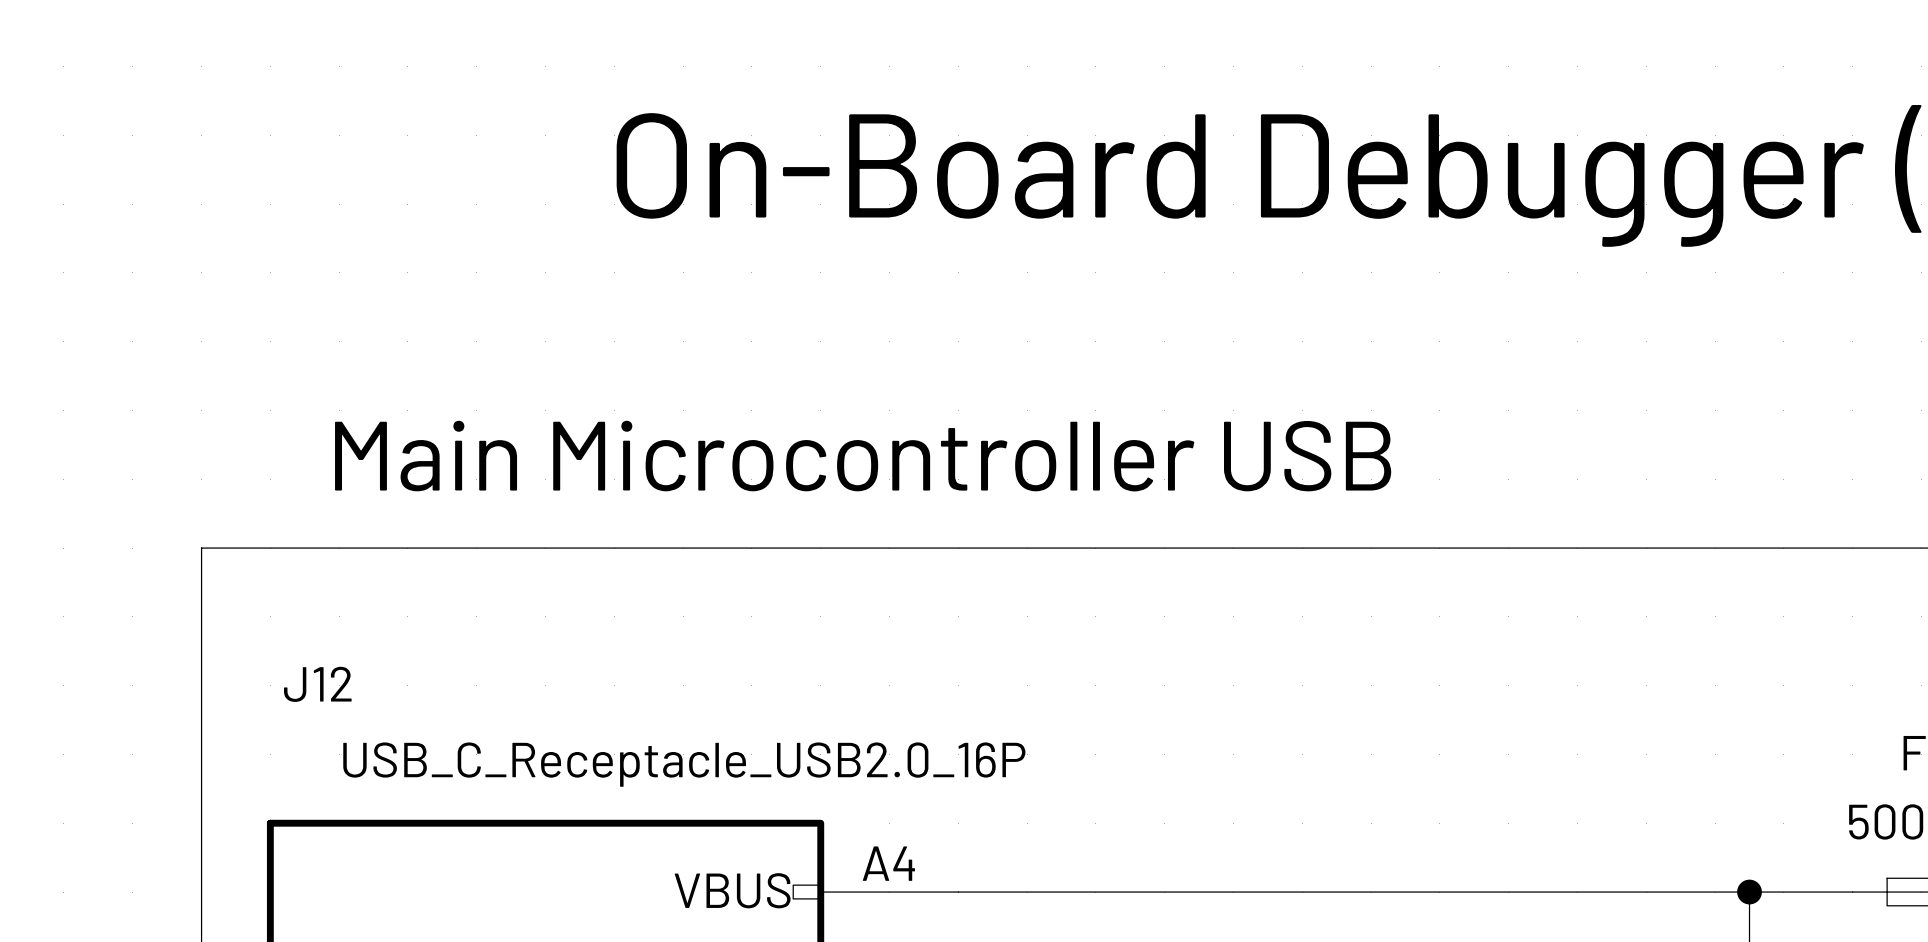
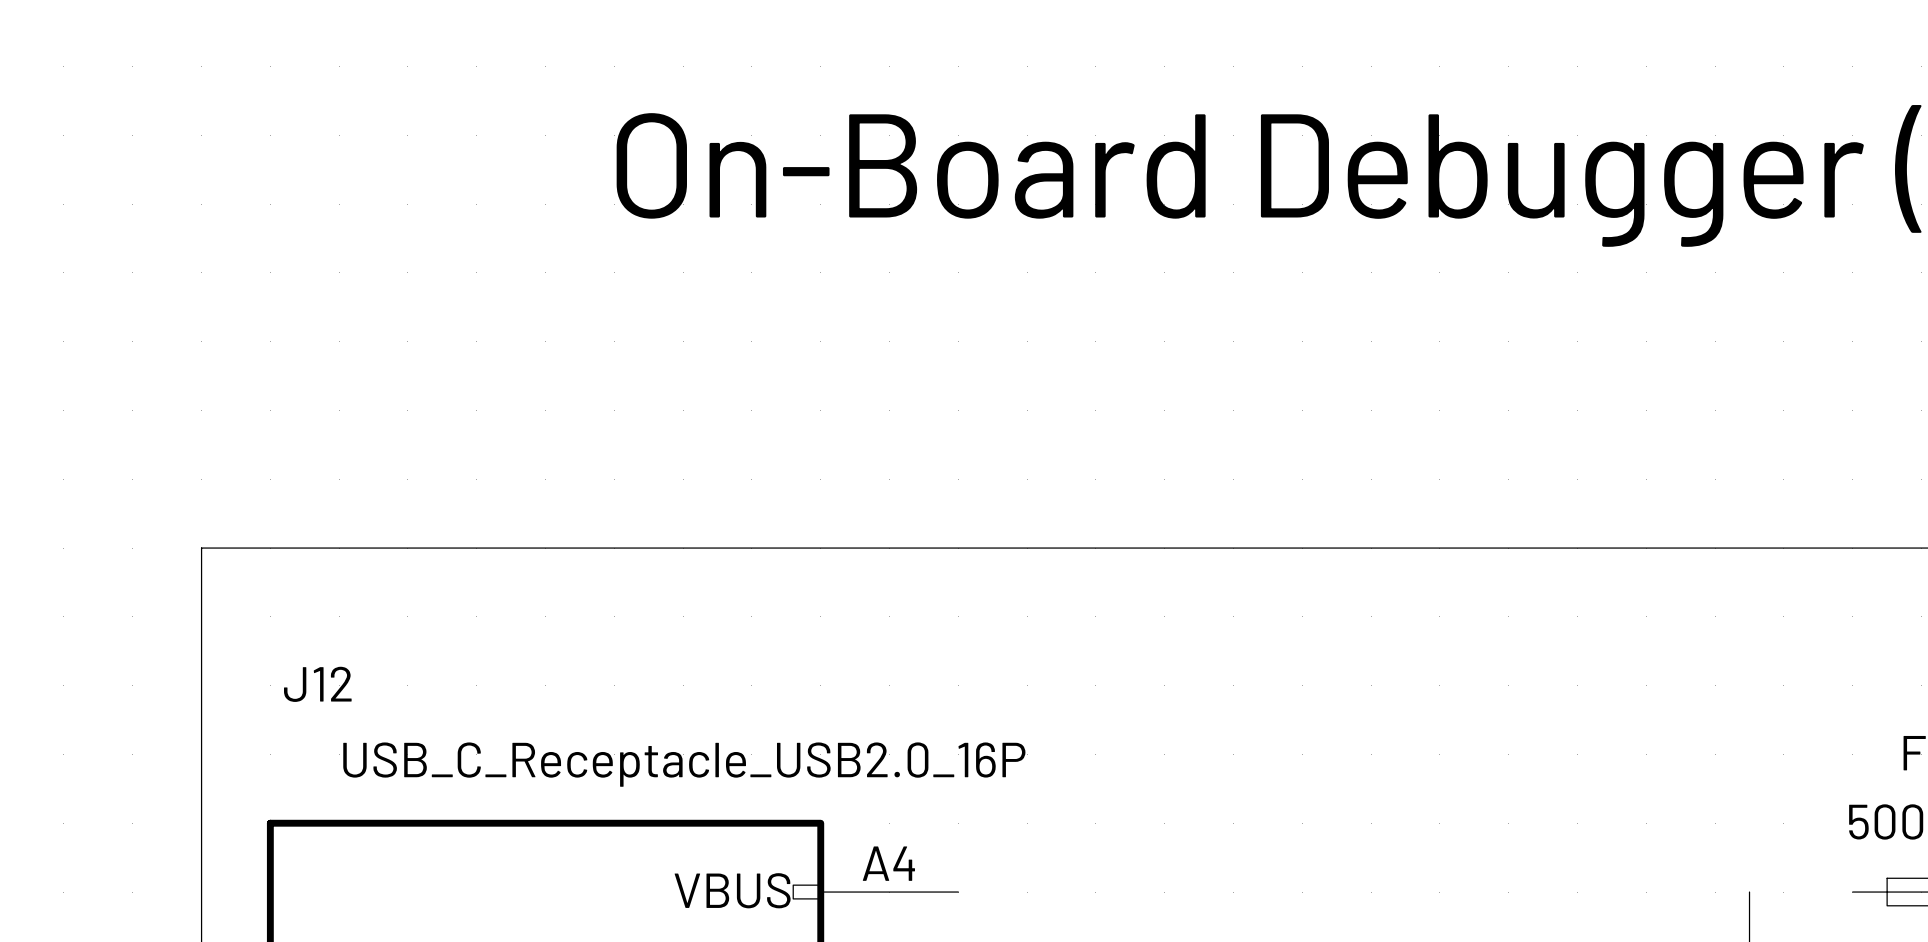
text: Main Microcontroller USB (863, 456) -> none
wire: (958, 892) (1852, 892) -> none
junction: (1749, 892) -> none

